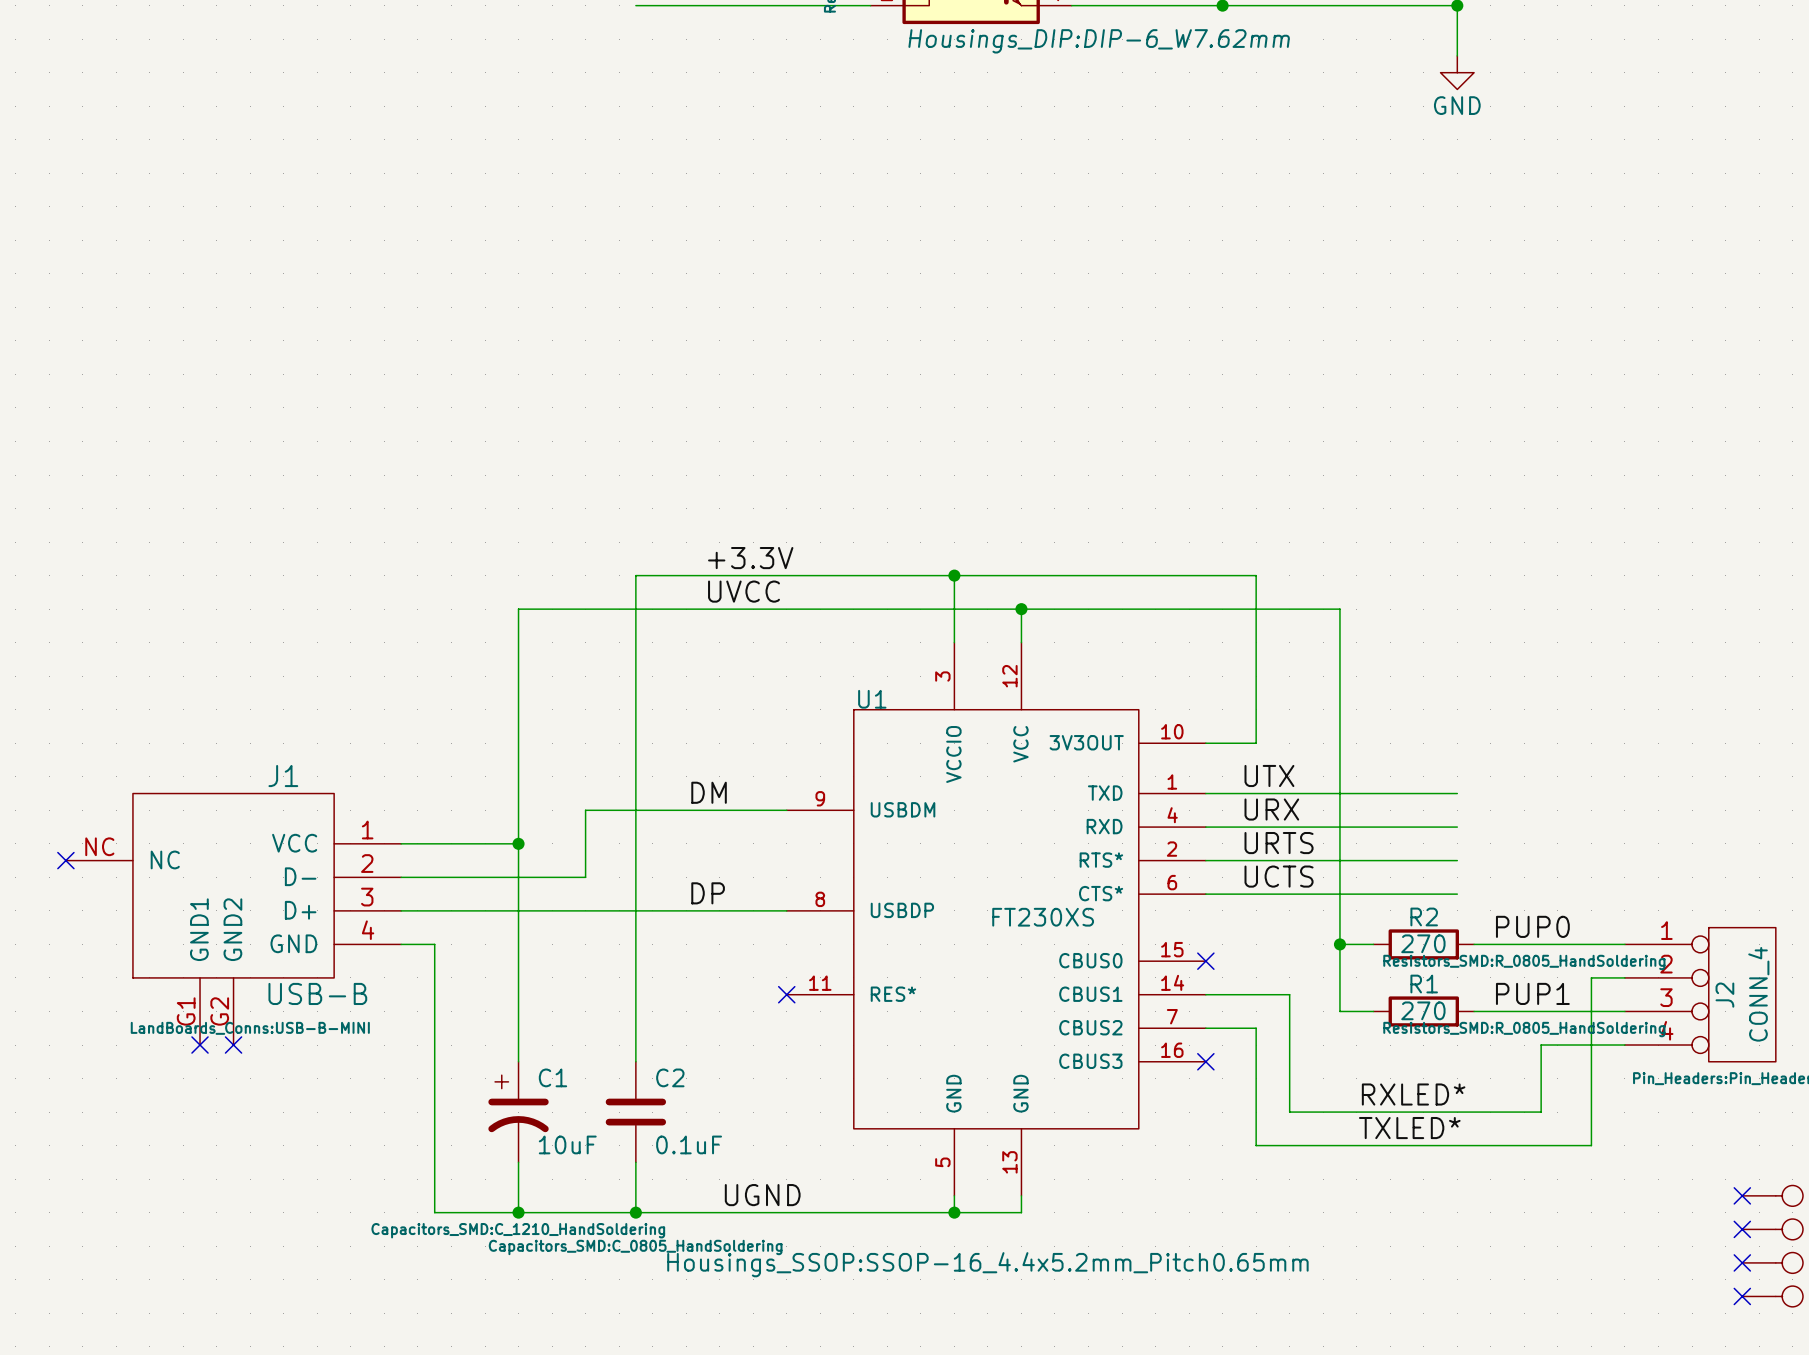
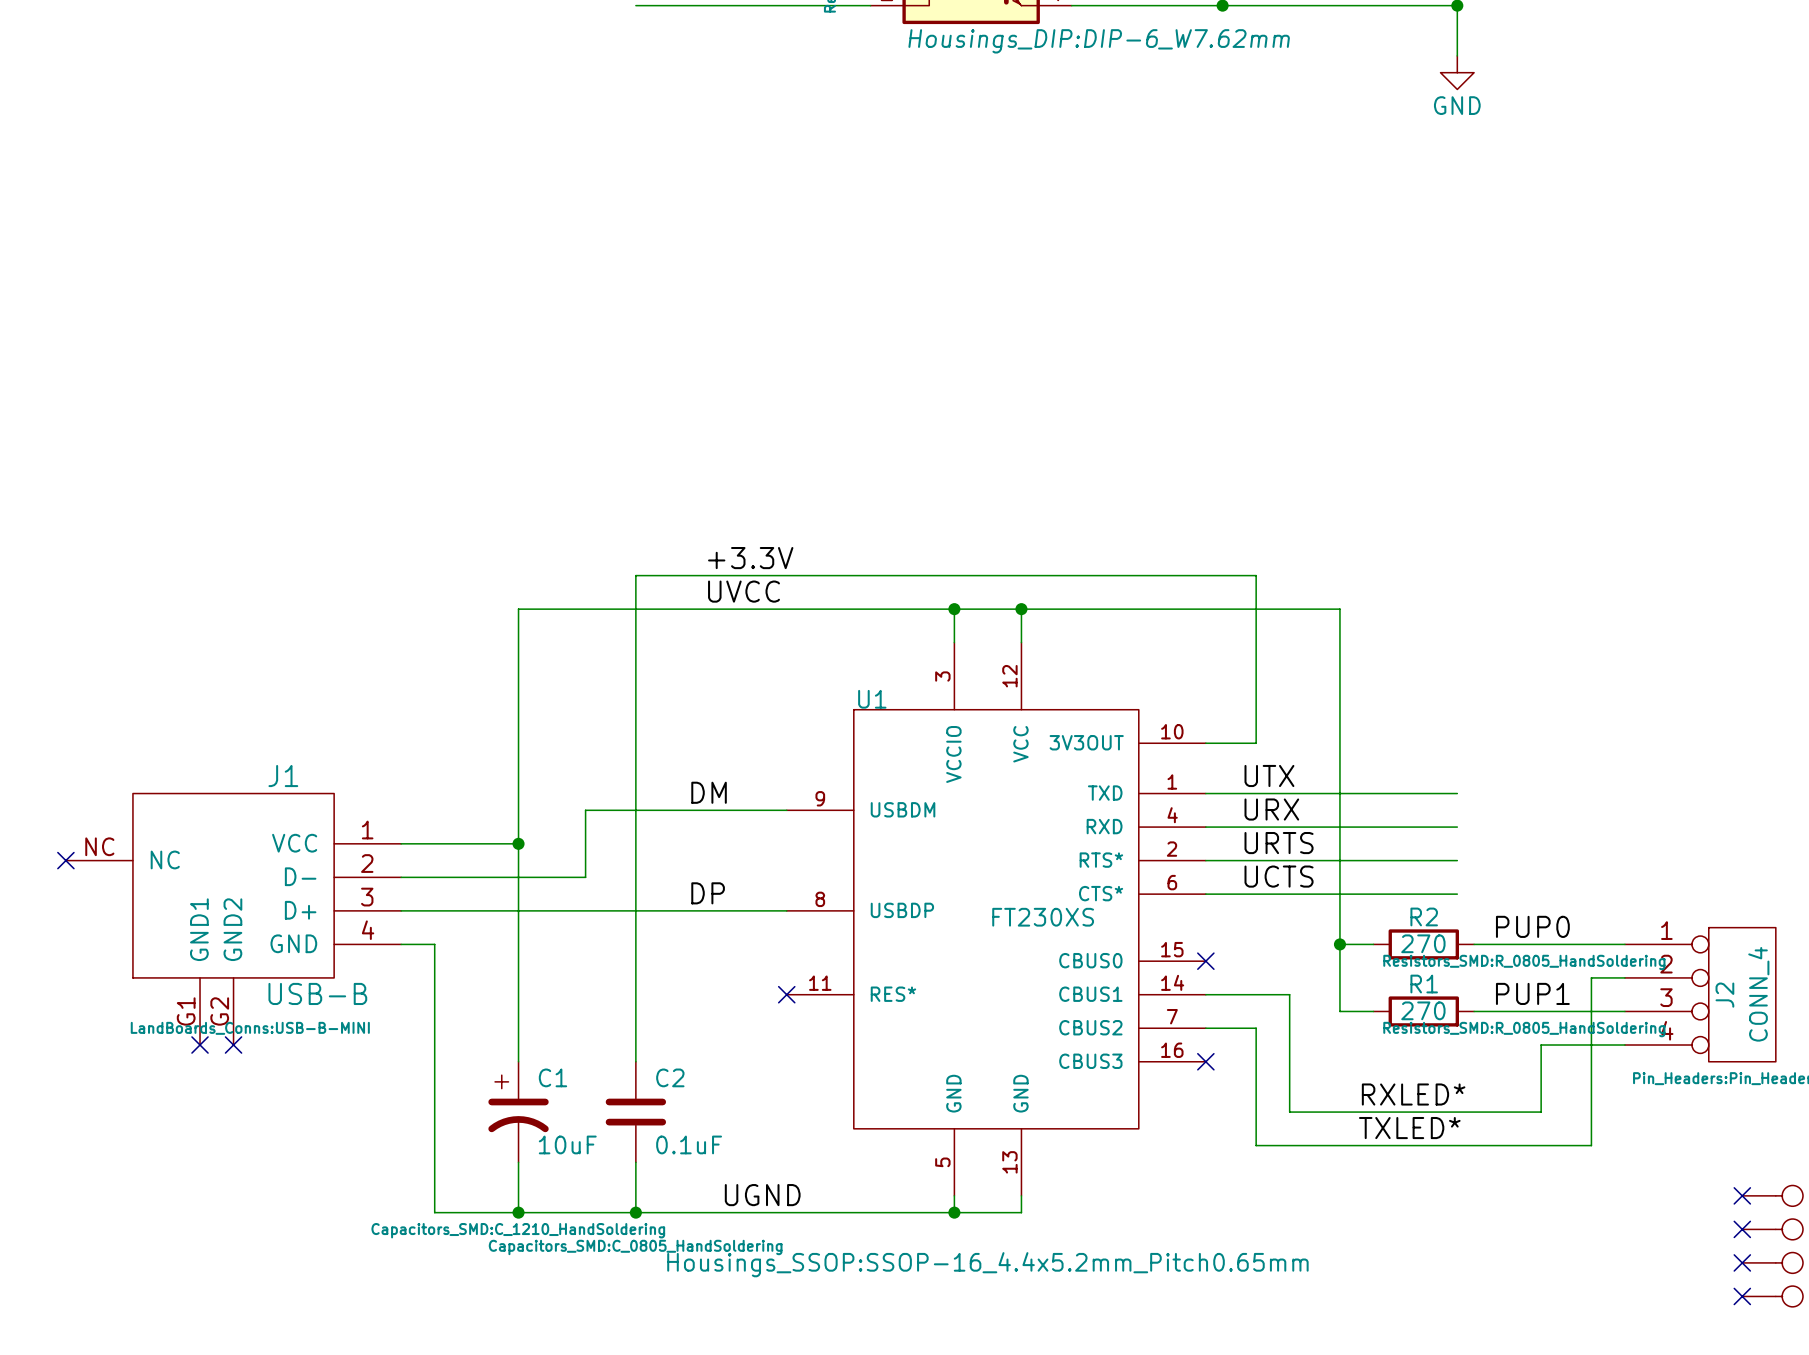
wire: (954, 575) (954, 609) -> none
junction position: (954, 575) -> (954, 609)

